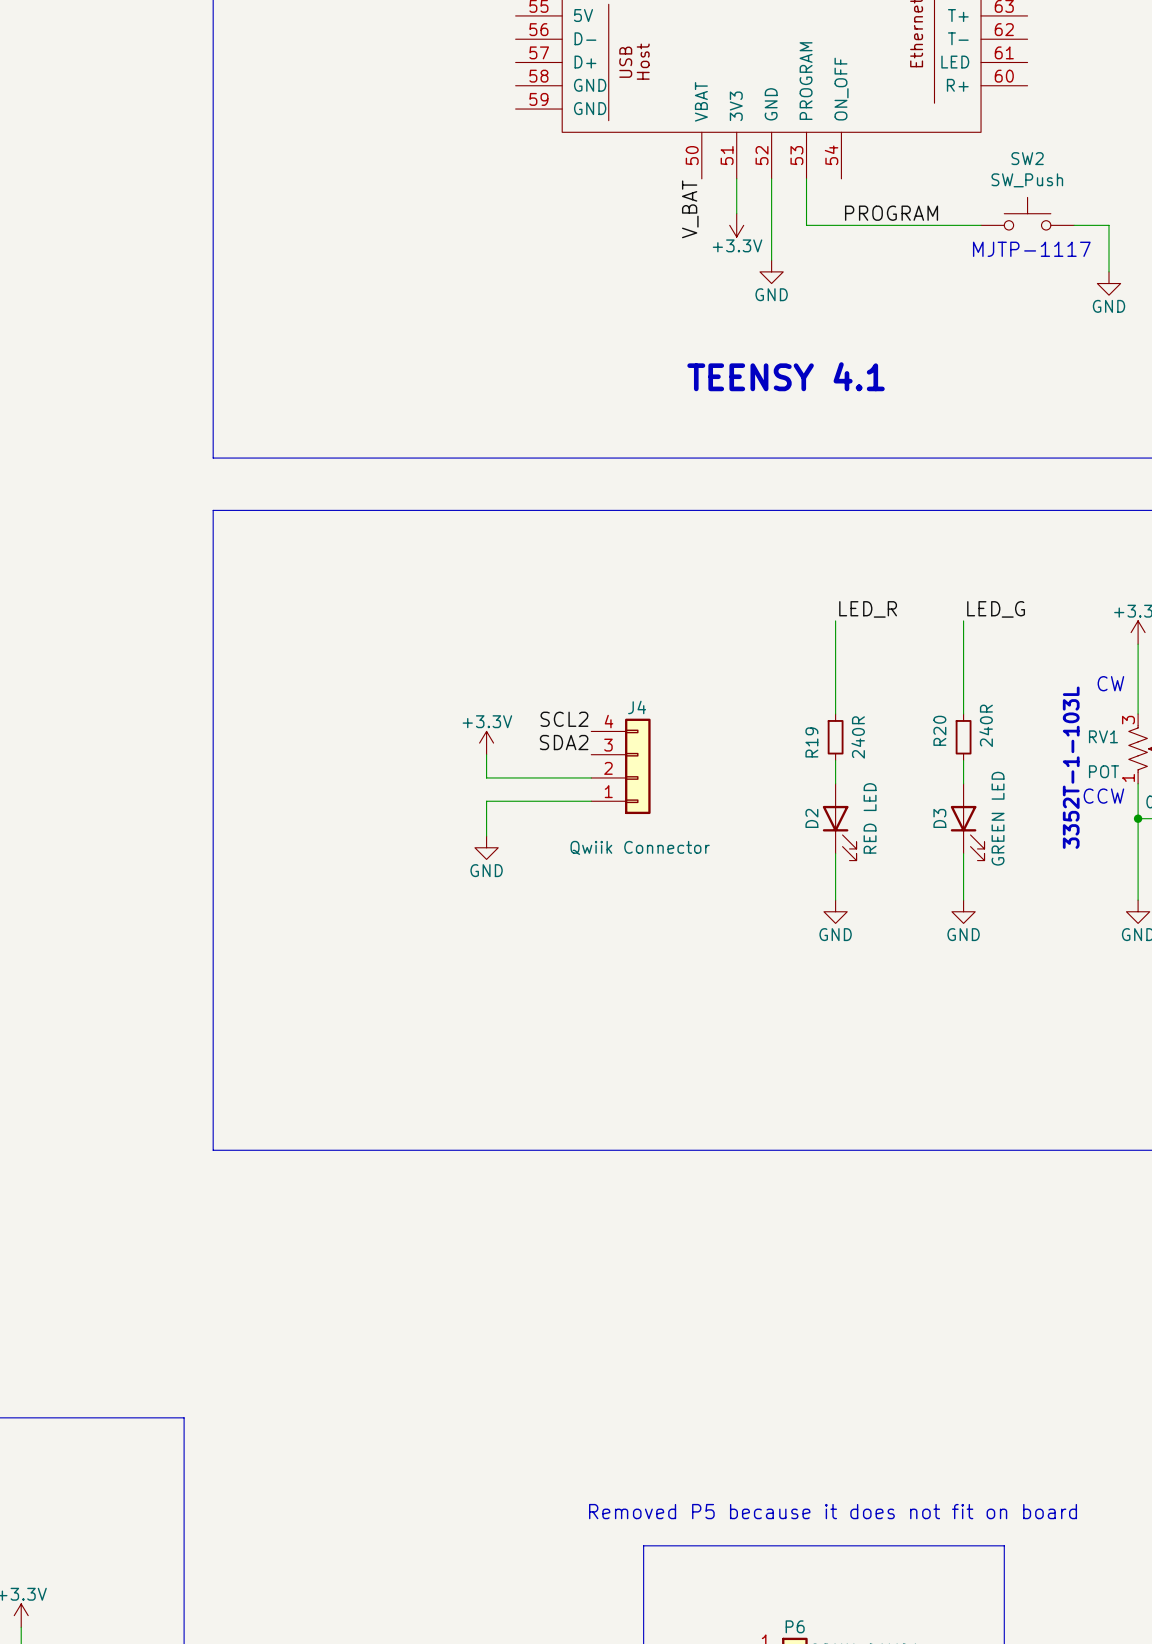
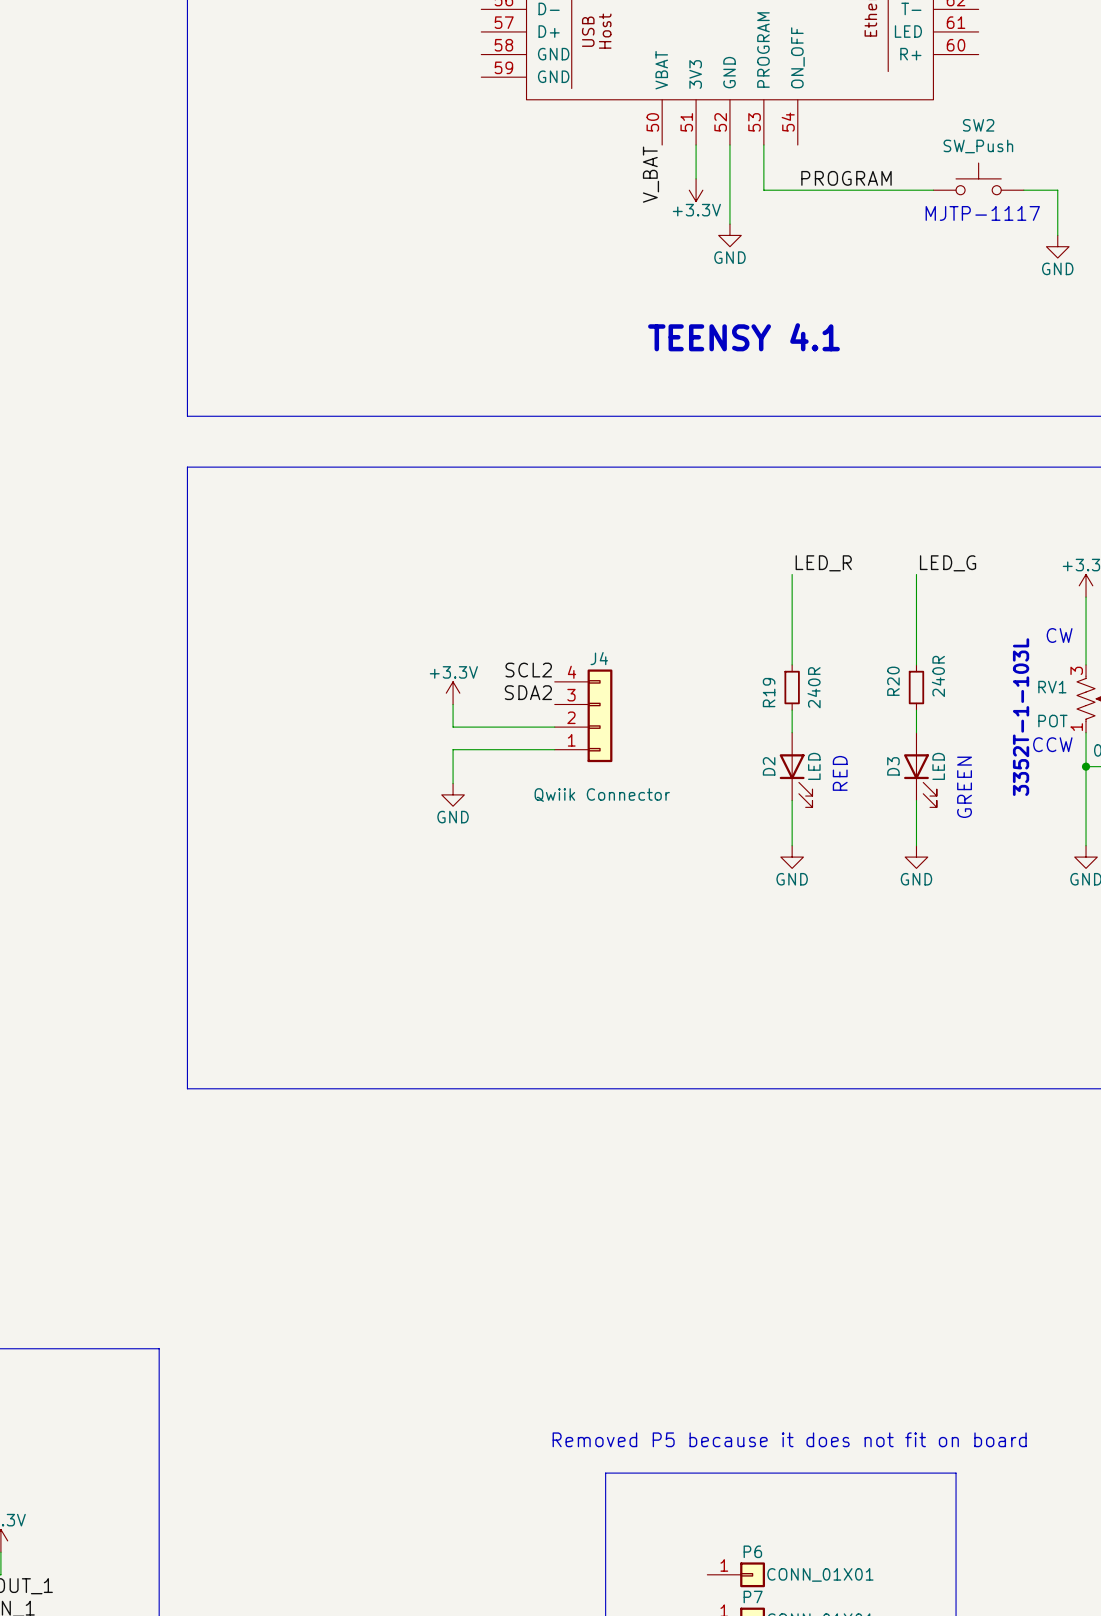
D2 value: RED LED (870, 818) -> LED (814, 766)
D3 value: GREEN LED (998, 818) -> LED (938, 766)
text: none -> RED (840, 773)
text: none -> GREEN (964, 787)

